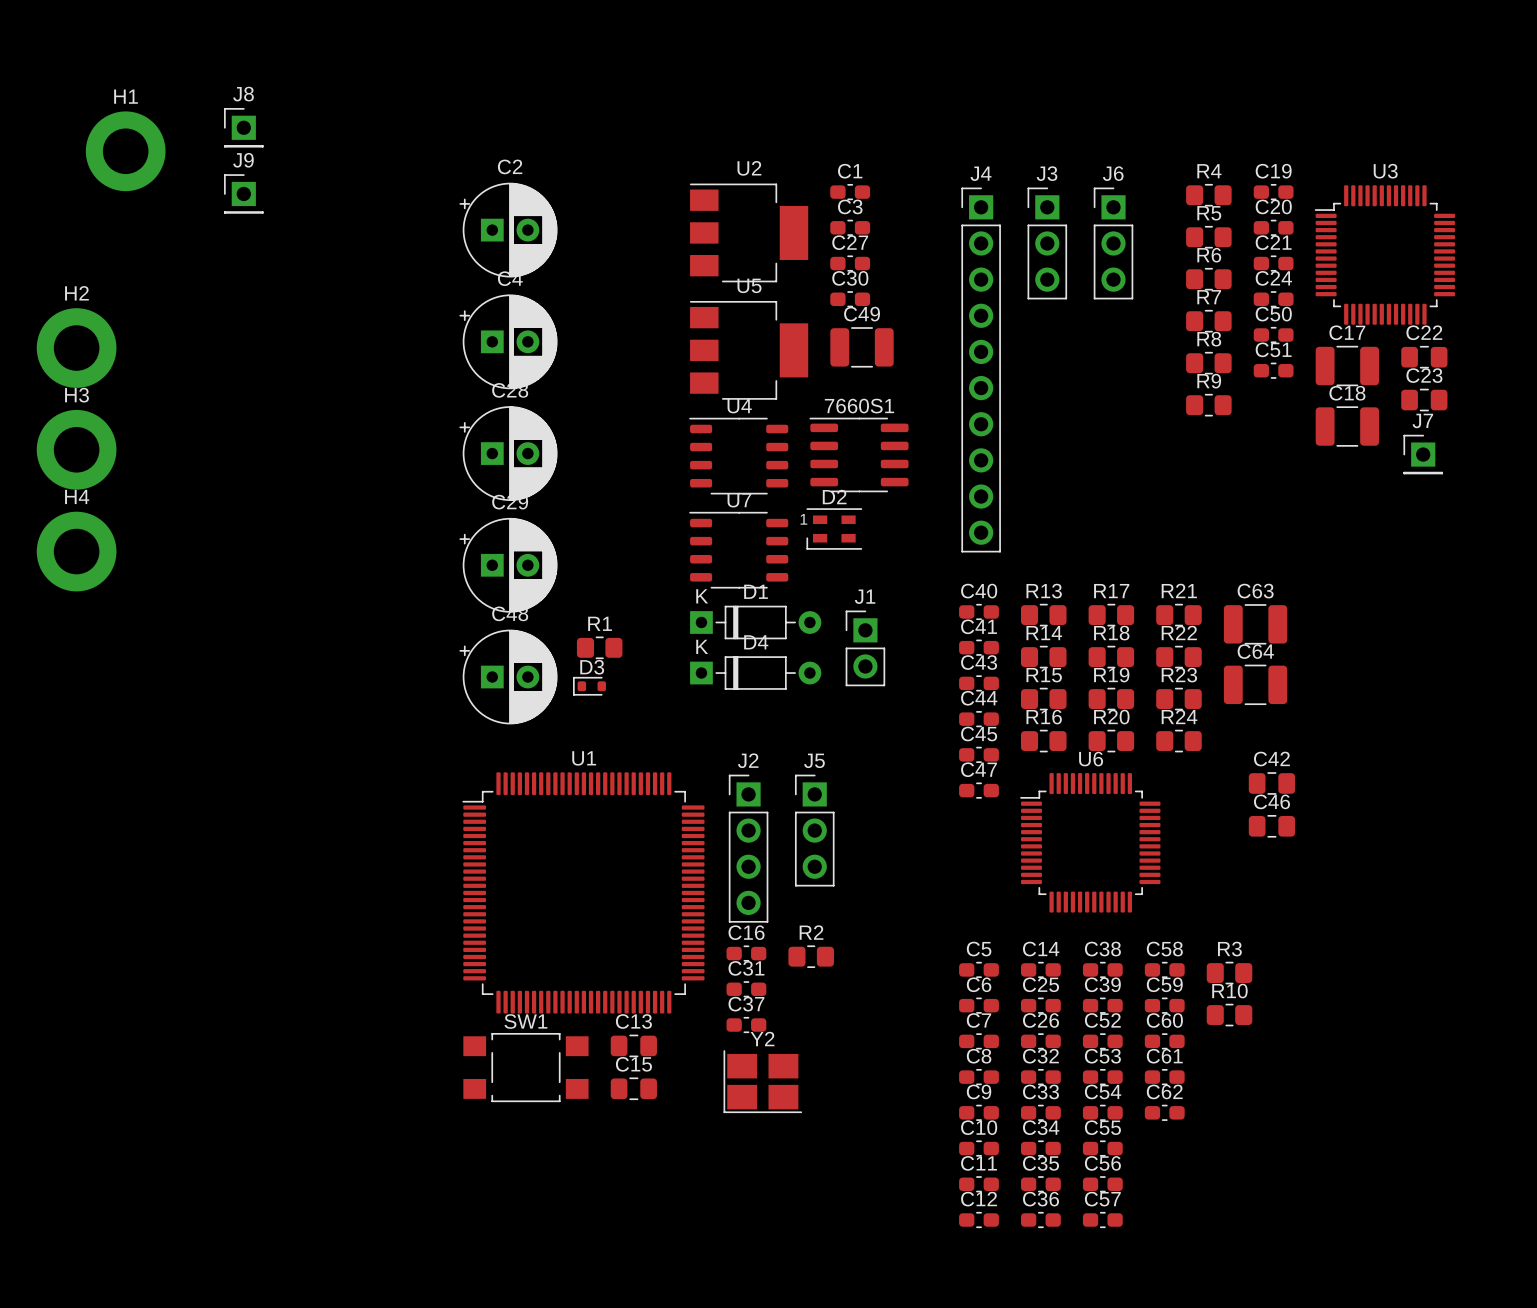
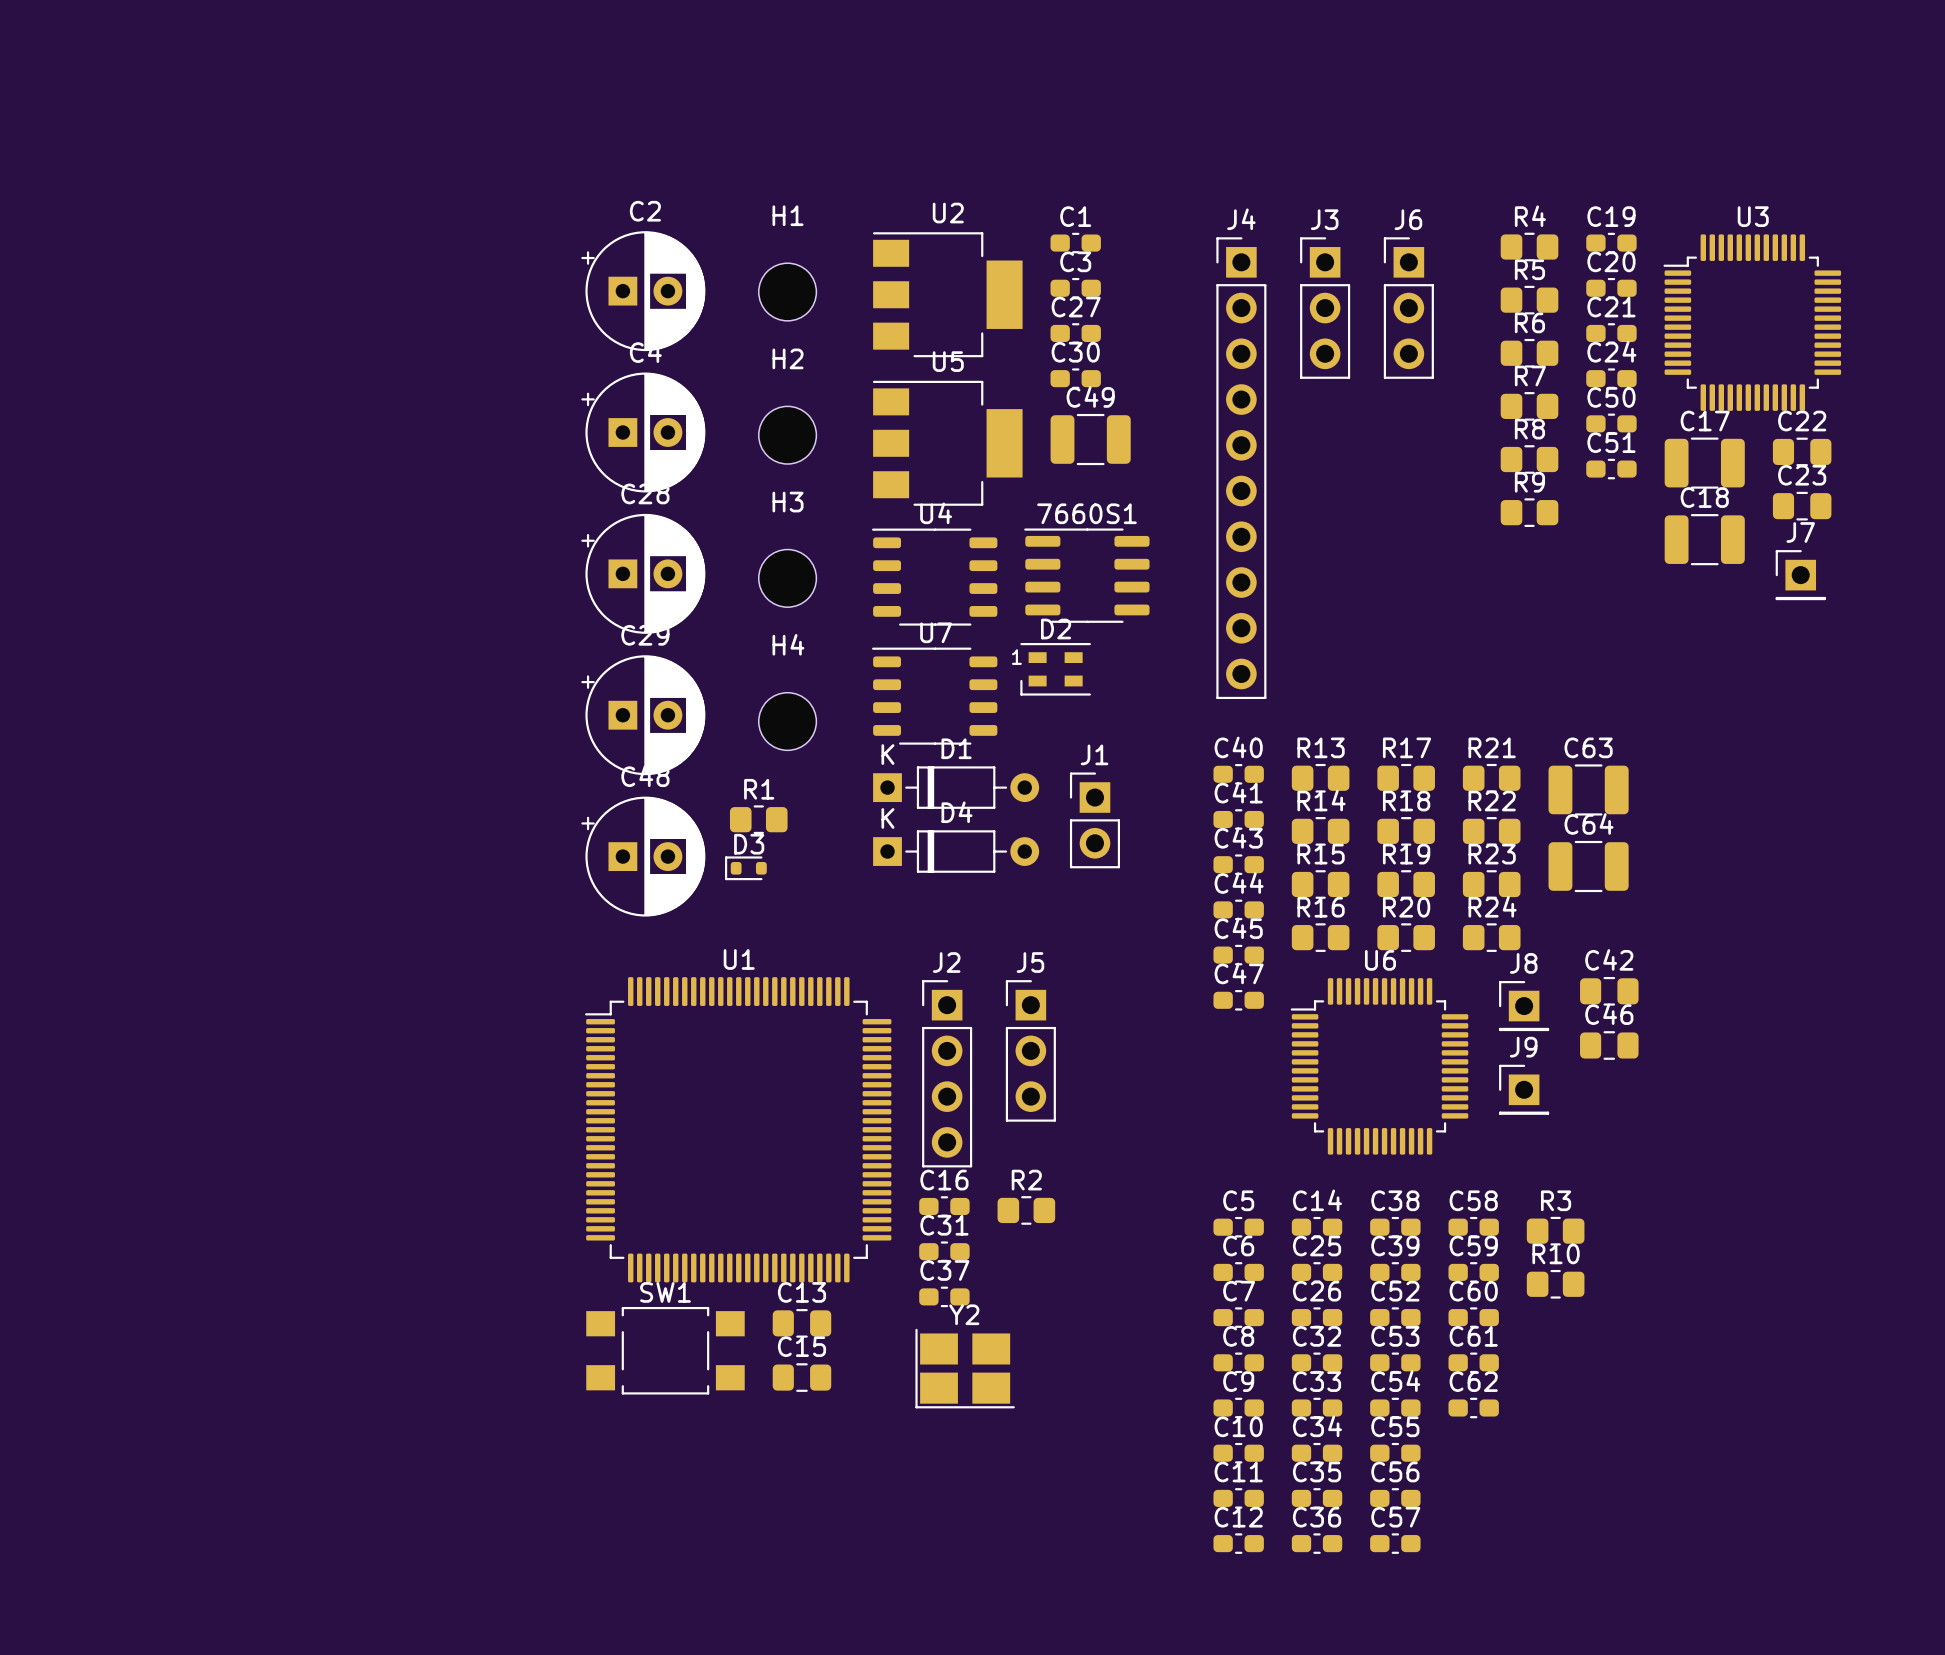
H1 footprint: [85, 111, 166, 192] -> [758, 263, 817, 321]
J8 position: (243, 127) -> (1524, 1006)
J9 position: (243, 193) -> (1524, 1089)
H2 footprint: [36, 308, 117, 388] -> [758, 406, 817, 465]
H3 footprint: [36, 409, 117, 490] -> [758, 549, 817, 608]
H4 footprint: [36, 511, 117, 592] -> [758, 692, 817, 751]

